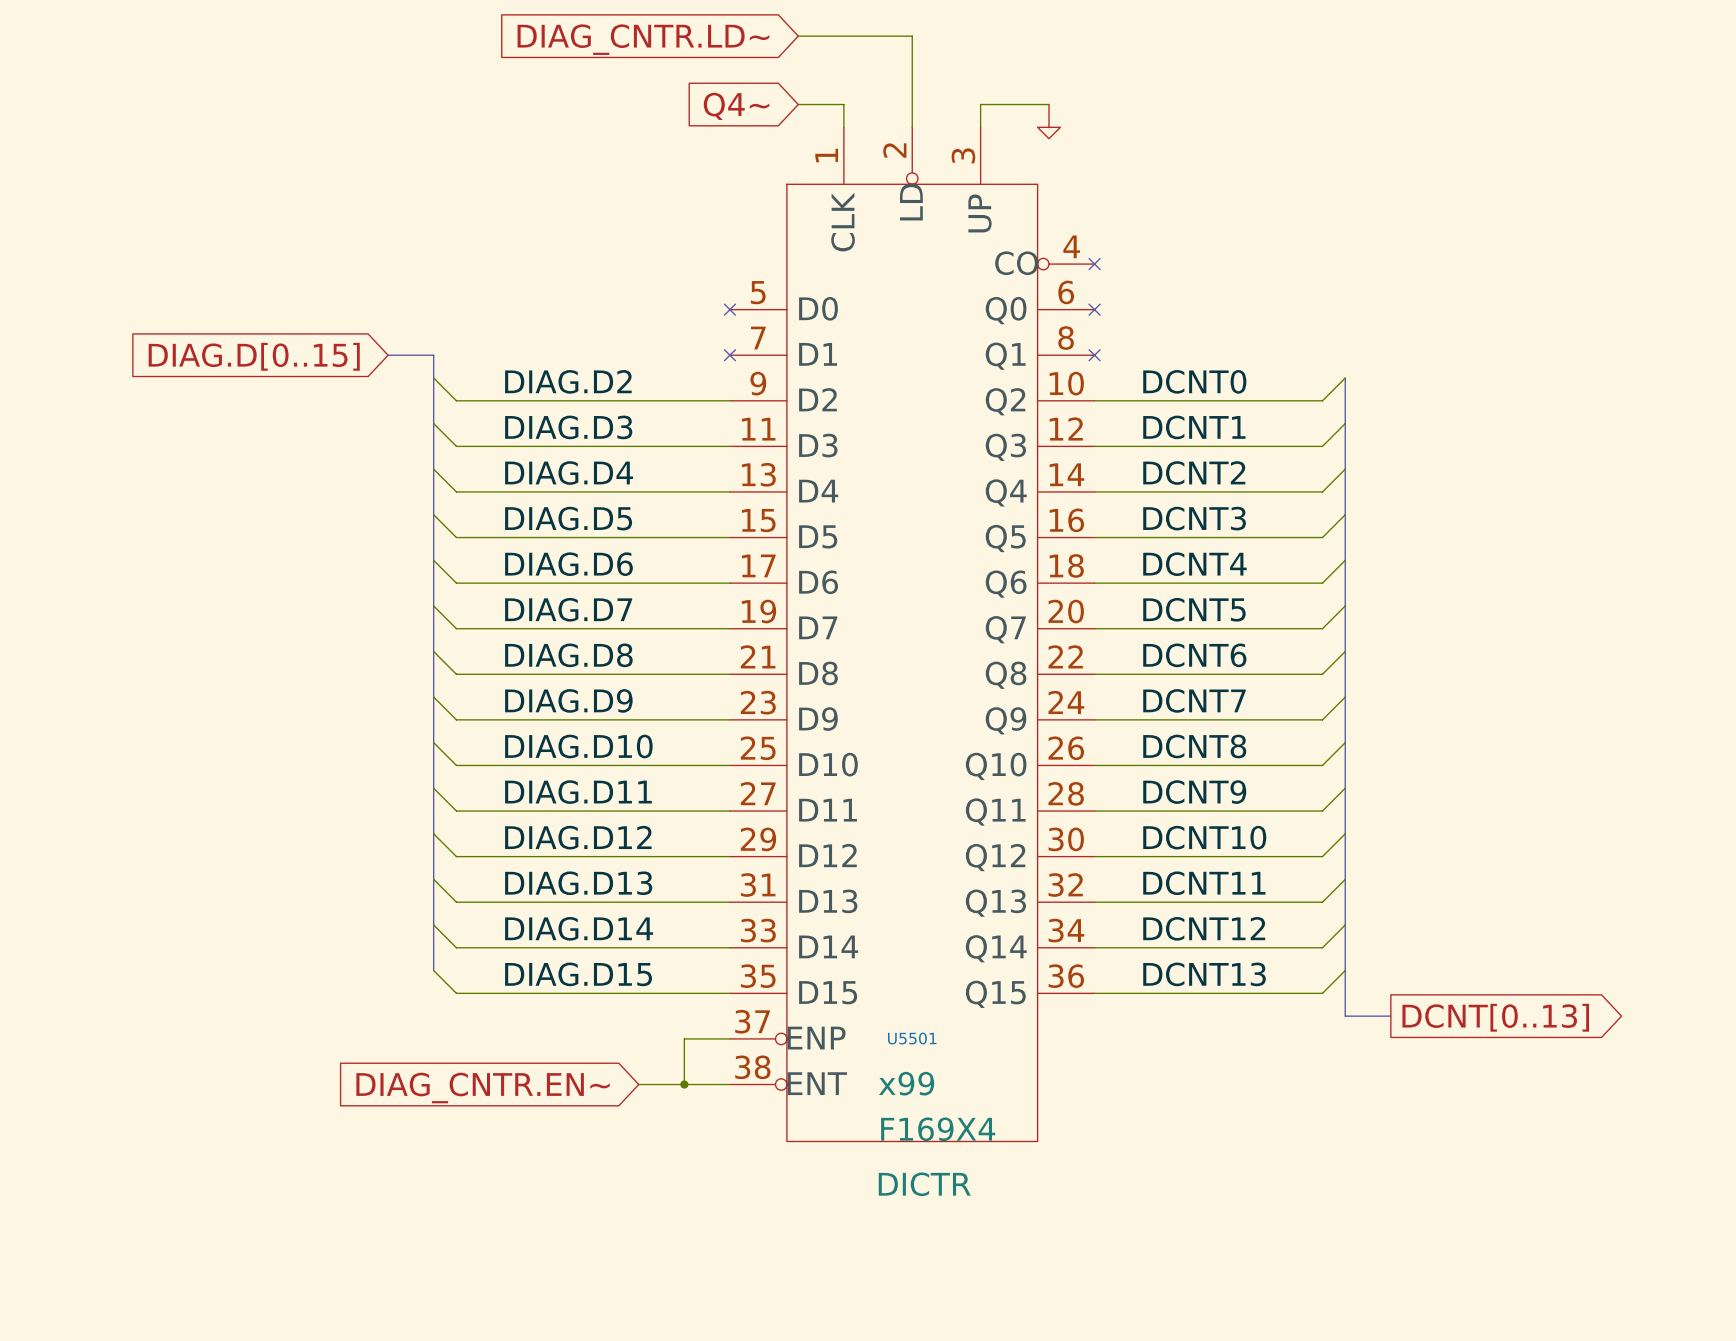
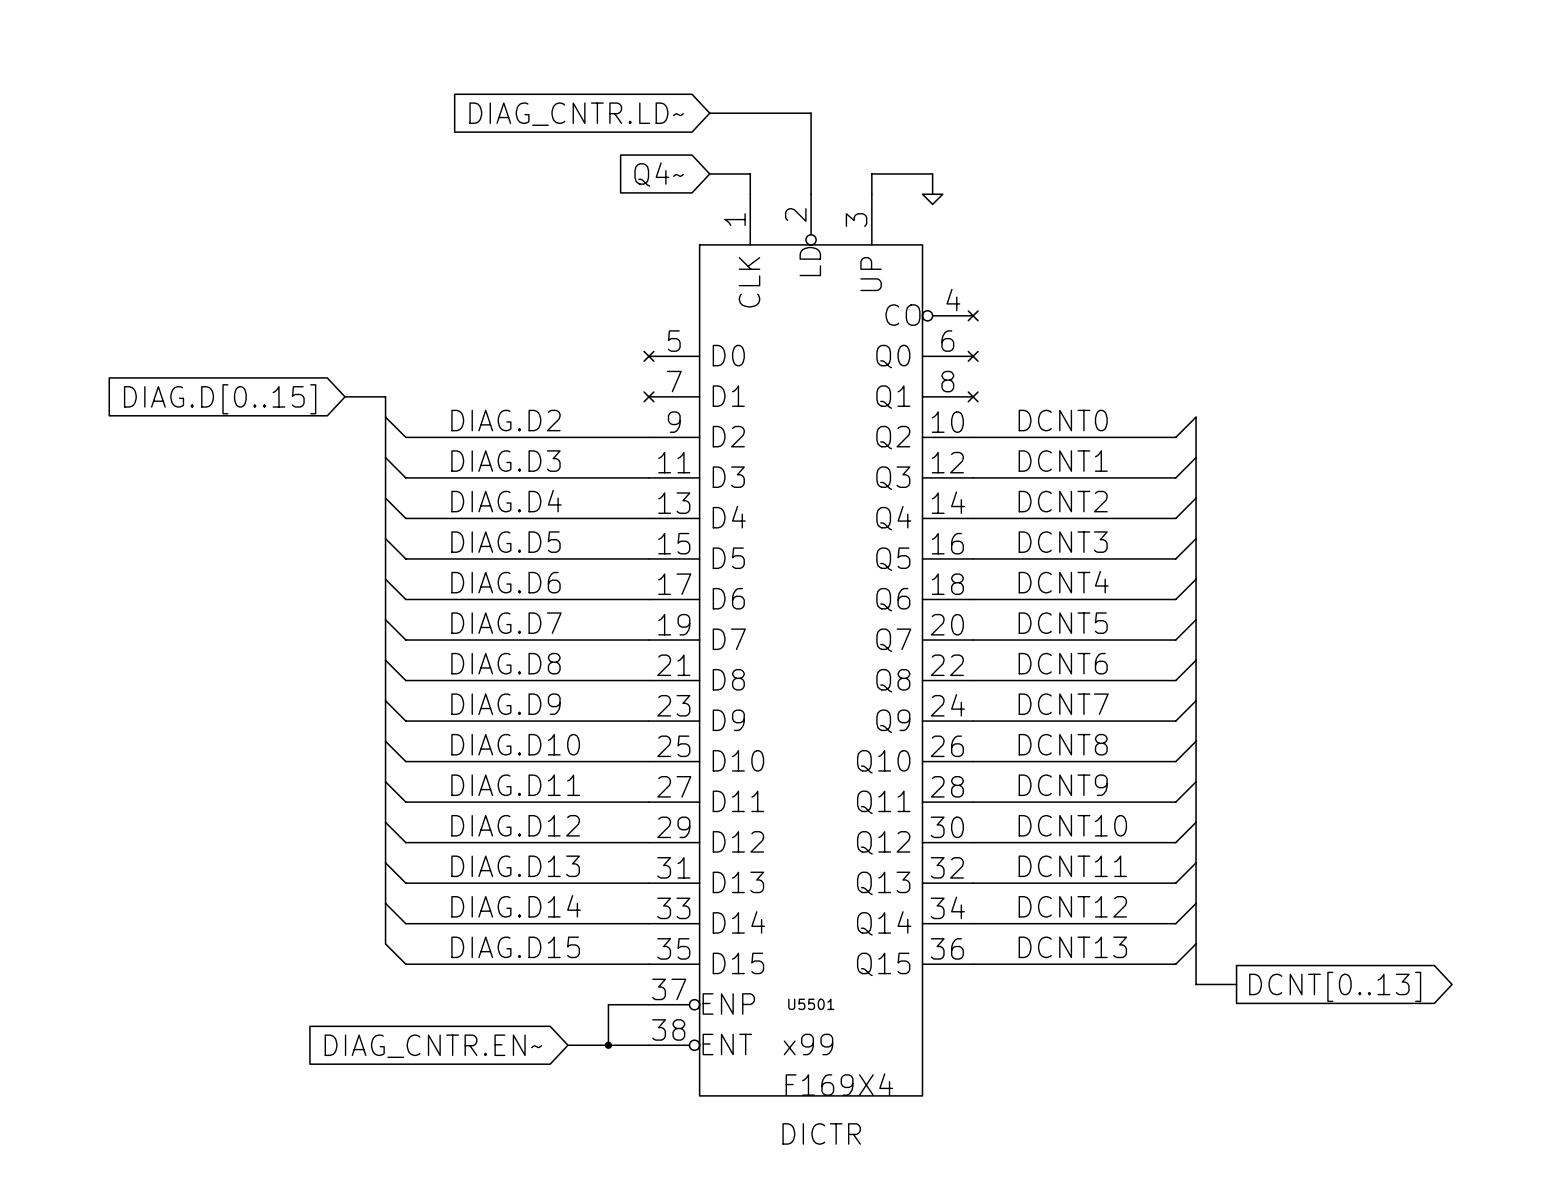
wire: (798, 36) (912, 36) (912, 127) -> (709, 113) (811, 113) (811, 194)
global label position: DIAG_CNTR.LD~ (643, 39) -> DIAG_CNTR.LD~ (576, 114)
wire: (798, 104) (843, 104) (843, 127) -> (709, 173) (750, 173) (750, 194)
wire: (1048, 104) (980, 104) (980, 127) -> (932, 173) (871, 173) (871, 194)
global label position: Q4~ (736, 106) -> Q4~ (659, 174)
power symbol position: (1048, 121) -> (932, 189)
no-connect mark: (1094, 264) -> none
no-connect mark: (729, 309) -> none
no-connect mark: (1094, 309) -> none
bus: (388, 355) (433, 355) (433, 446) -> (345, 396) (385, 396)
no-connect mark: (729, 355) -> none
global label position: DIAG.D[0..15] (254, 356) -> DIAG.D[0..15] (220, 399)
wire: (433, 378) (456, 400) (729, 400) -> none
wire: (1345, 378) (1322, 400) (1094, 400) -> none
bus: (1345, 378) (1345, 469) -> none
label: DIAG.D2 (568, 381) -> none
label: DCNT0 (1194, 381) -> none
no-connect mark: none -> (648, 356)
no-connect mark: none -> (973, 356)
wire: (433, 423) (456, 446) (729, 446) -> none
wire: (1345, 423) (1322, 446) (1094, 446) -> none
label: DIAG.D3 (568, 427) -> none
label: DCNT1 (1194, 427) -> none
no-connect mark: none -> (648, 396)
no-connect mark: none -> (973, 396)
label: DIAG.D4 (569, 473) -> DIAG.D2 (505, 420)
label: DCNT2 (1194, 473) -> DCNT0 (1063, 420)
label: DIAG.D5 (568, 518) -> DIAG.D3 (505, 461)
label: DCNT3 (1194, 518) -> DCNT1 (1063, 461)
label: DIAG.D6 (568, 564) -> DIAG.D4 (506, 501)
label: DCNT4 (1194, 564) -> DCNT2 (1063, 501)
label: DIAG.D7 (568, 609) -> DIAG.D5 (505, 542)
label: DCNT5 (1194, 609) -> DCNT3 (1063, 542)
U5501 position: (912, 634) -> (811, 645)
label: DIAG.D8 (568, 655) -> DIAG.D6 (505, 582)
label: DCNT6 (1194, 655) -> DCNT4 (1063, 582)
label: DIAG.D9 (568, 700) -> DIAG.D7 (506, 623)
label: DCNT7 (1194, 700) -> DCNT5 (1063, 623)
label: DIAG.D10 (578, 746) -> DIAG.D8 (505, 663)
label: DCNT8 (1194, 746) -> DCNT6 (1063, 663)
label: DIAG.D11 (578, 792) -> DIAG.D9 (505, 704)
label: DCNT9 (1194, 792) -> DCNT7 (1063, 704)
label: DIAG.D12 (578, 837) -> DIAG.D10 (515, 744)
label: DCNT10 (1204, 837) -> DCNT8 (1063, 744)
label: DIAG.D13 (578, 883) -> DIAG.D11 (515, 785)
label: DCNT11 (1204, 883) -> DCNT9 (1063, 785)
label: DIAG.D14 (579, 928) -> DIAG.D12 (515, 825)
label: DCNT12 (1204, 928) -> DCNT10 (1072, 825)
bus: none -> (385, 862) (385, 943)
label: DIAG.D15 (578, 974) -> DIAG.D13 (515, 866)
label: DCNT13 (1204, 974) -> DCNT11 (1072, 866)
wire: none -> (1196, 903) (1175, 923) (973, 923)
bus: (1345, 1016) (1390, 1016) -> (1196, 903) (1196, 984) (1236, 984)
global label position: DCNT[0..13] (1495, 1017) -> DCNT[0..13] (1335, 986)
label: none -> DIAG.D14 (516, 906)
label: none -> DCNT12 (1072, 906)
wire: (684, 1038) (684, 1084) -> (608, 923) (405, 923) (385, 903)
wire: none -> (385, 943) (405, 964) (567, 964)
wire: none -> (1196, 943) (1175, 964) (973, 964)
label: none -> DIAG.D15 (515, 947)
label: none -> DCNT13 (1072, 947)
junction: (684, 1084) -> none
global label position: DIAG_CNTR.EN~ (483, 1087) -> DIAG_CNTR.EN~ (433, 1046)
wire: none -> (648, 1004) (608, 1004) (608, 1045)
wire: none -> (567, 1045) (648, 1045)
junction: none -> (608, 1045)

